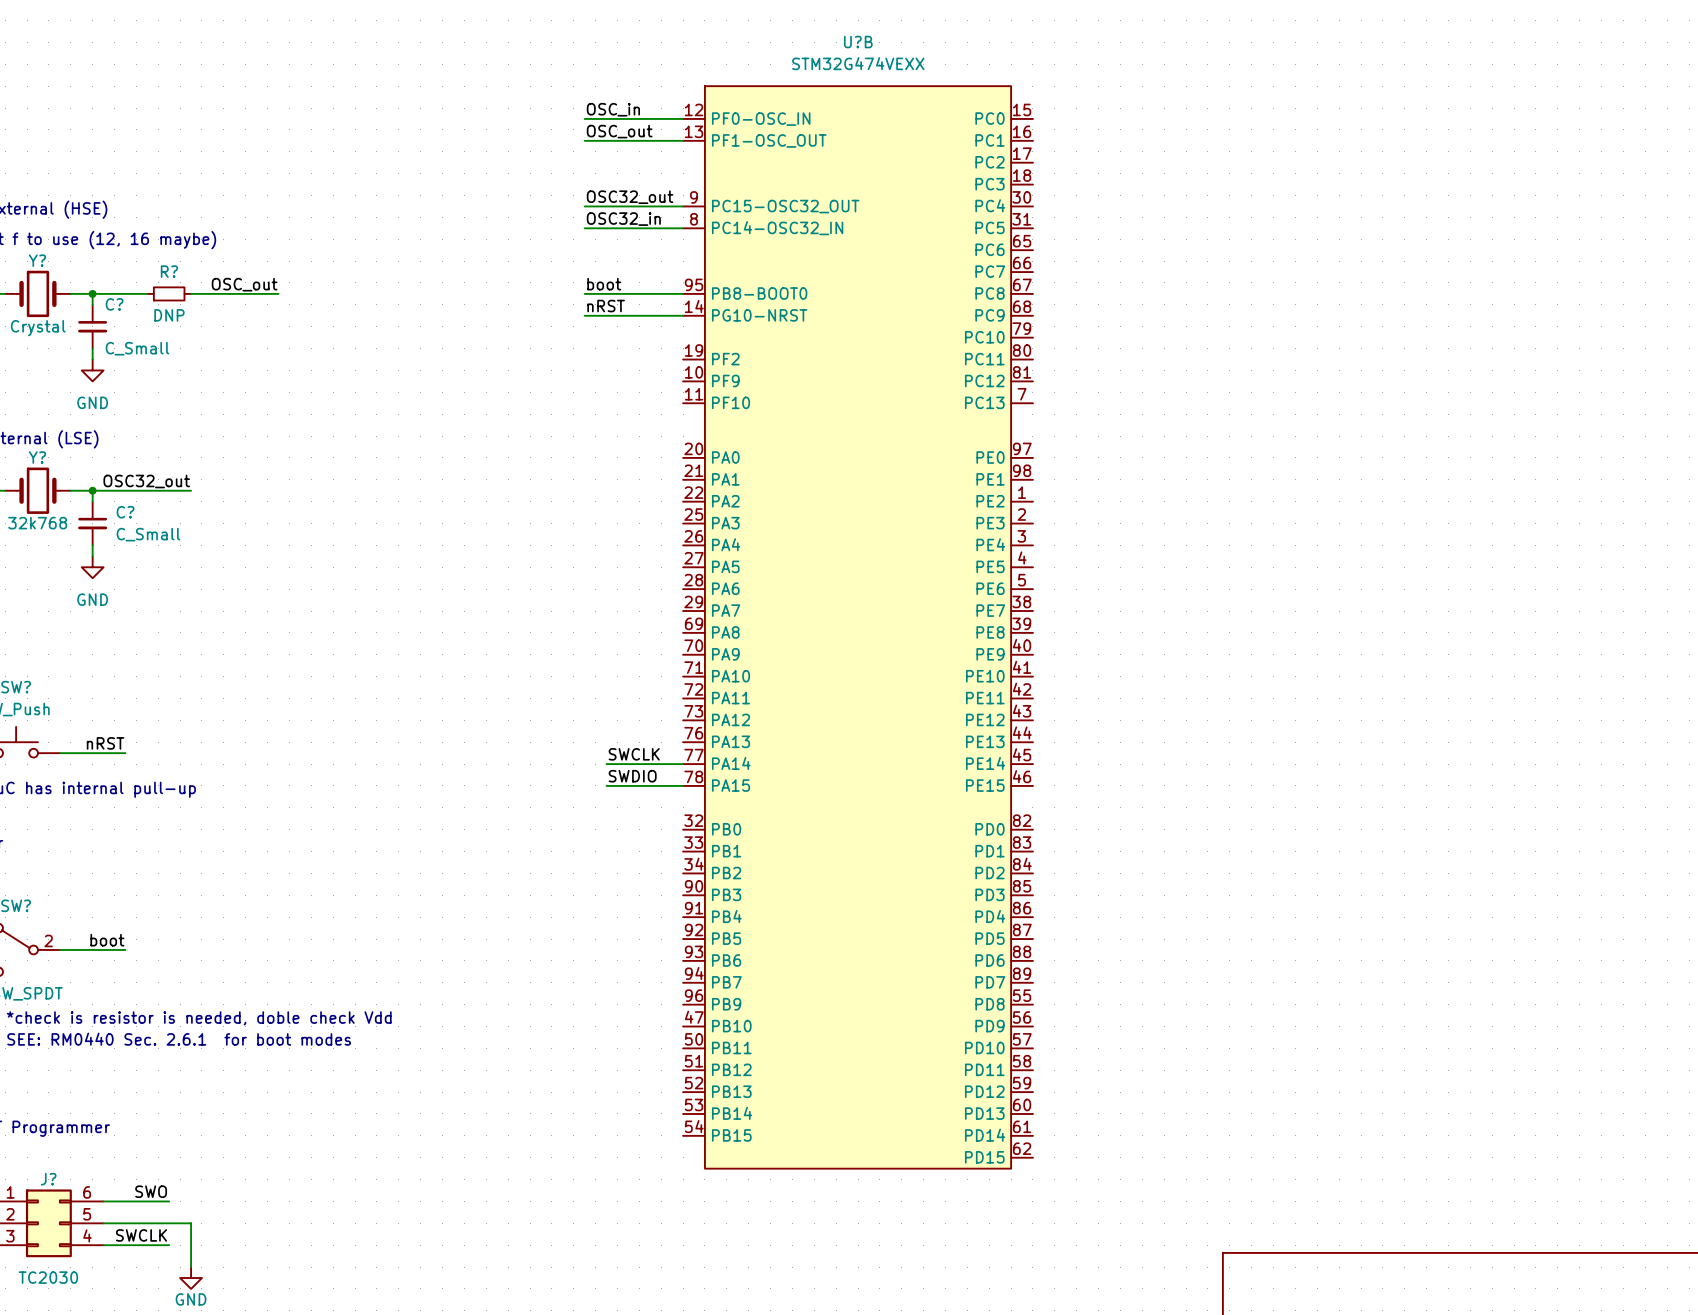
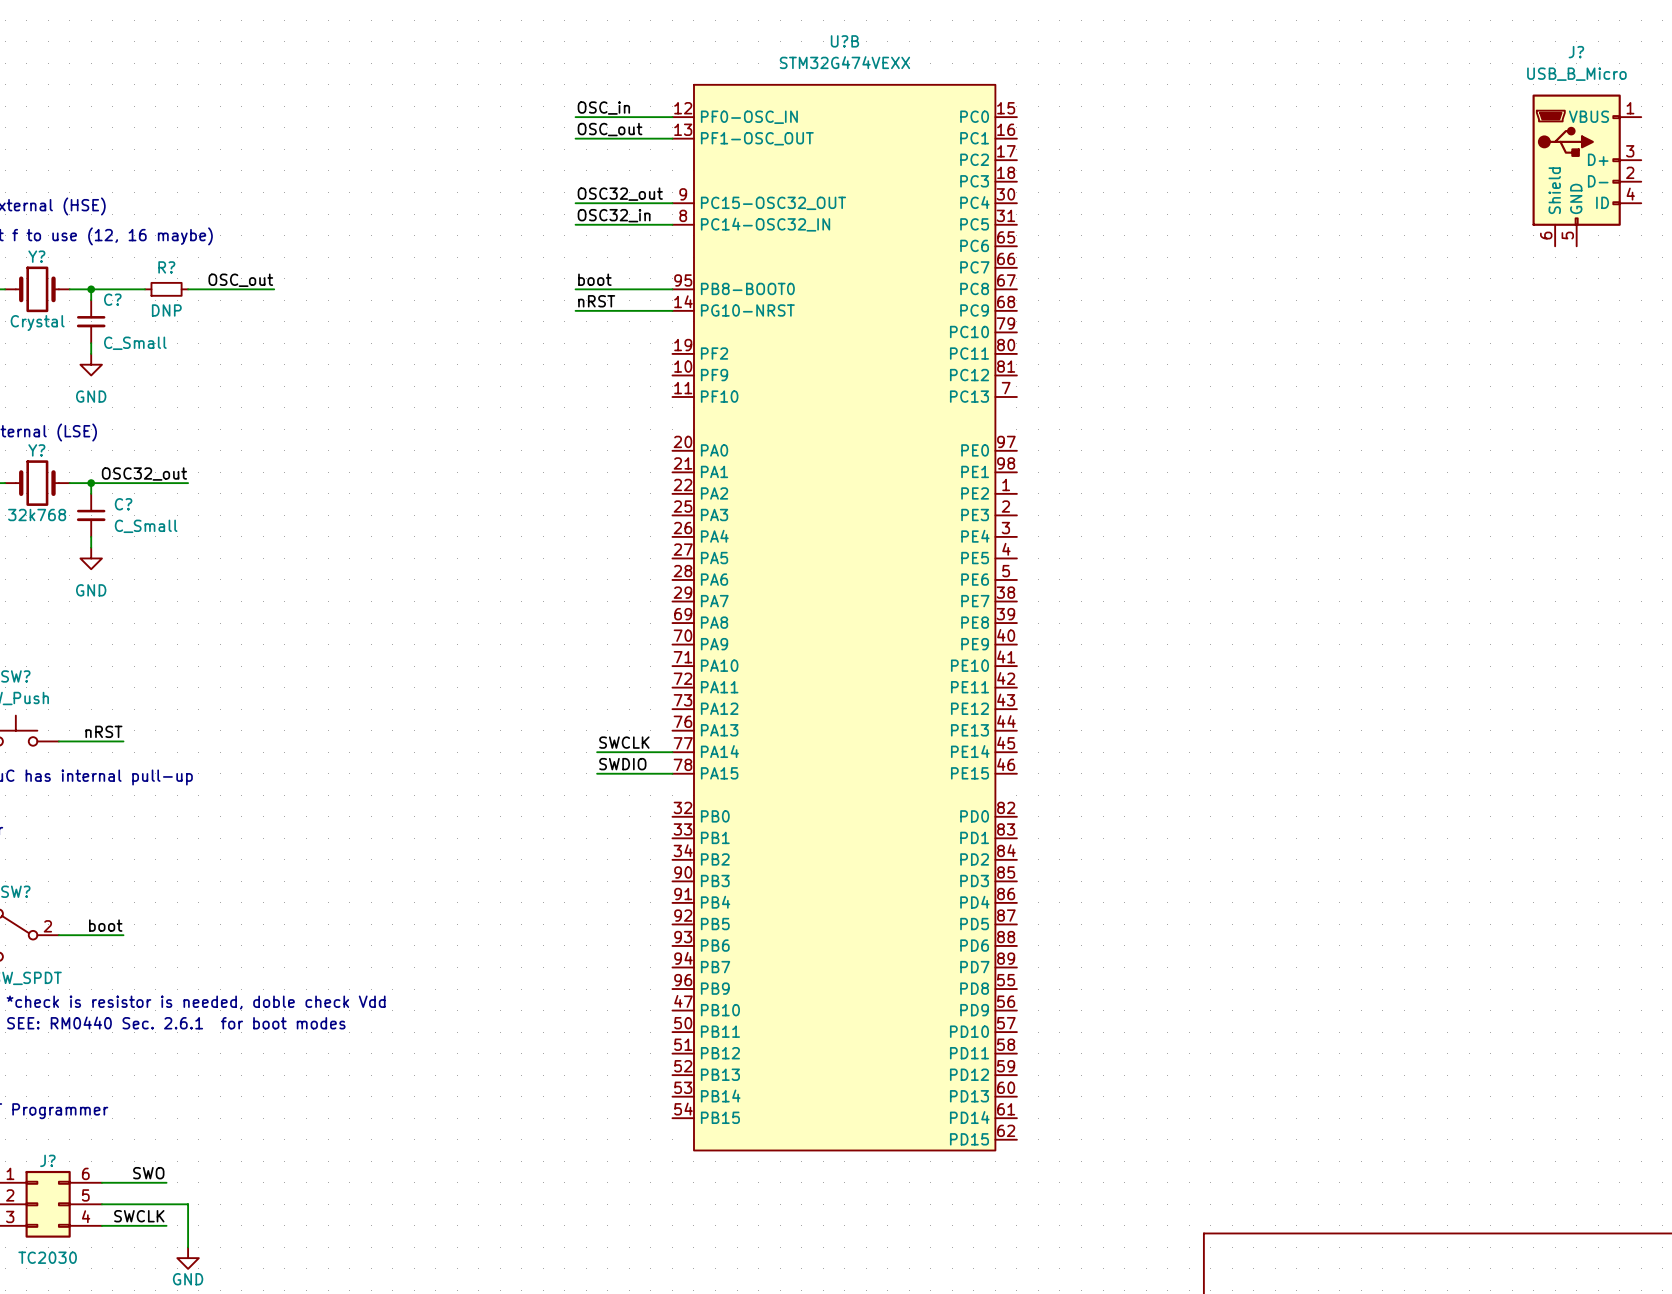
J?: none -> USB_B_Micro (1586, 170)

